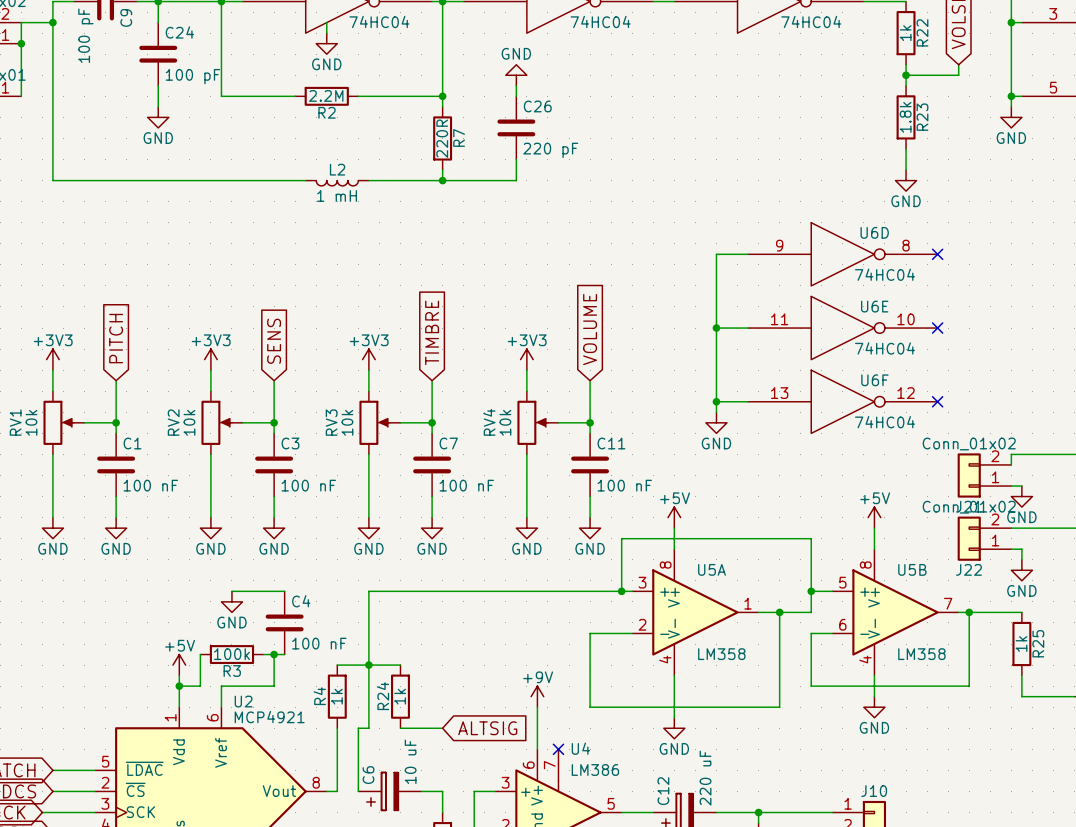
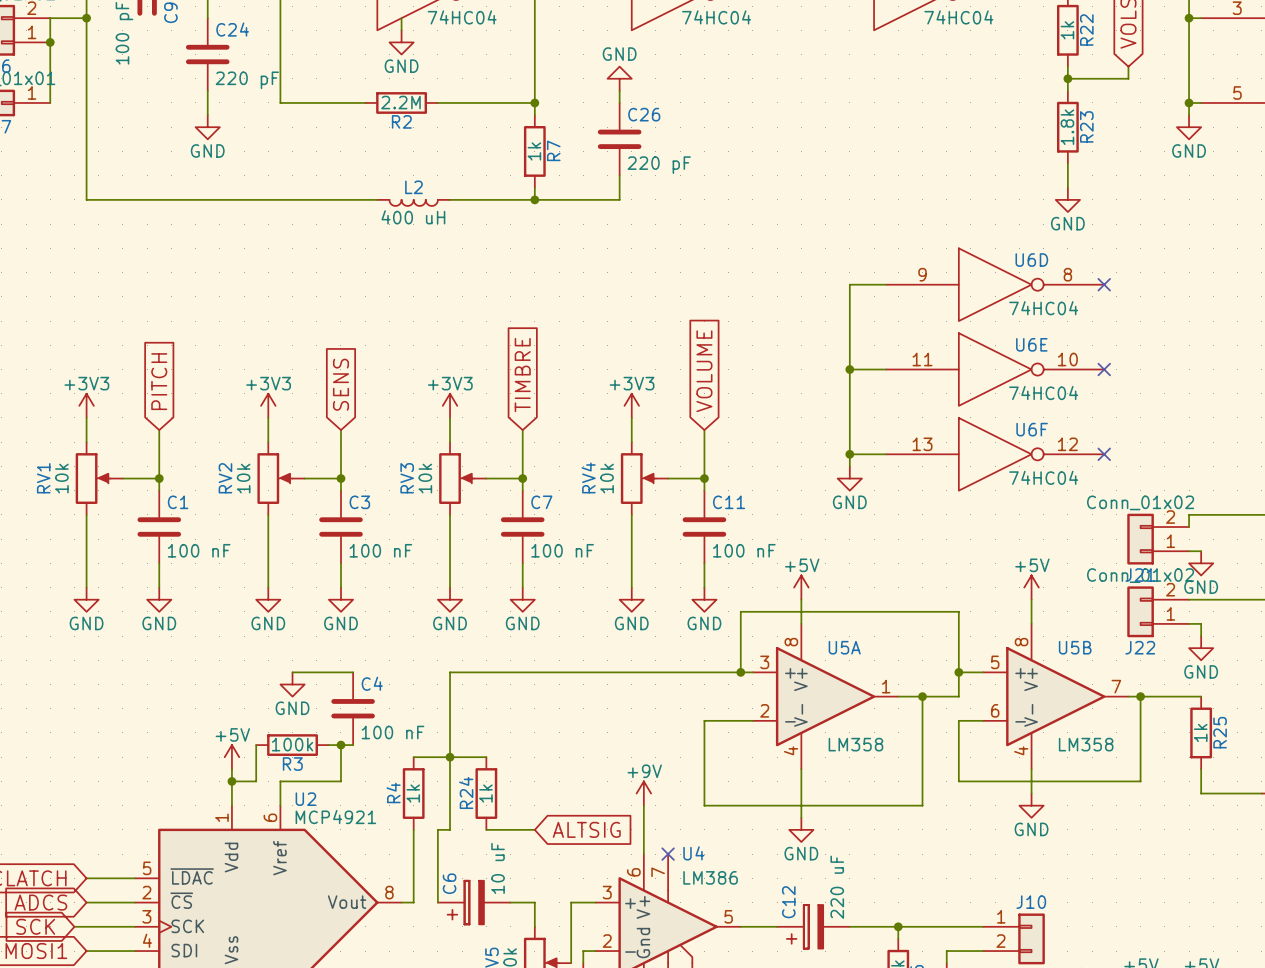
C24 value: 100 pF (192, 76) -> 220 pF (247, 80)
R7 value: 220R (442, 138) -> 1k (534, 151)
L2 value: 1 mH (337, 195) -> 400 uH (413, 217)

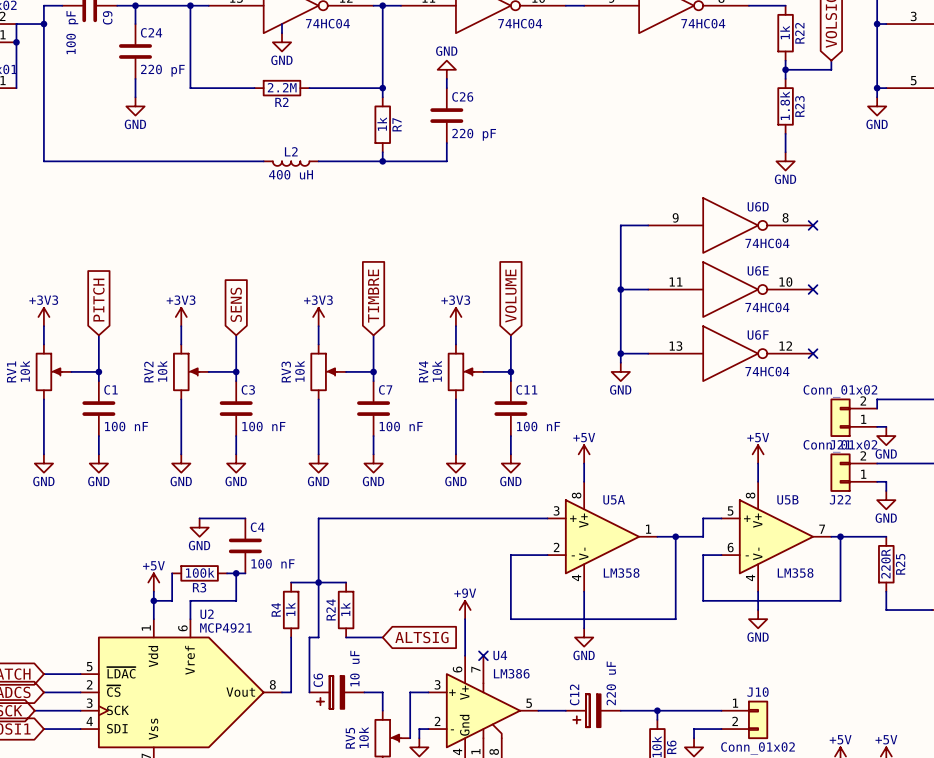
wire: (740, 672) (740, 611) (958, 611) (958, 672) -> none
junction: (740, 672) -> none
junction: (958, 672) -> none
R25 value: 1k (1200, 732) -> 220R (885, 563)

